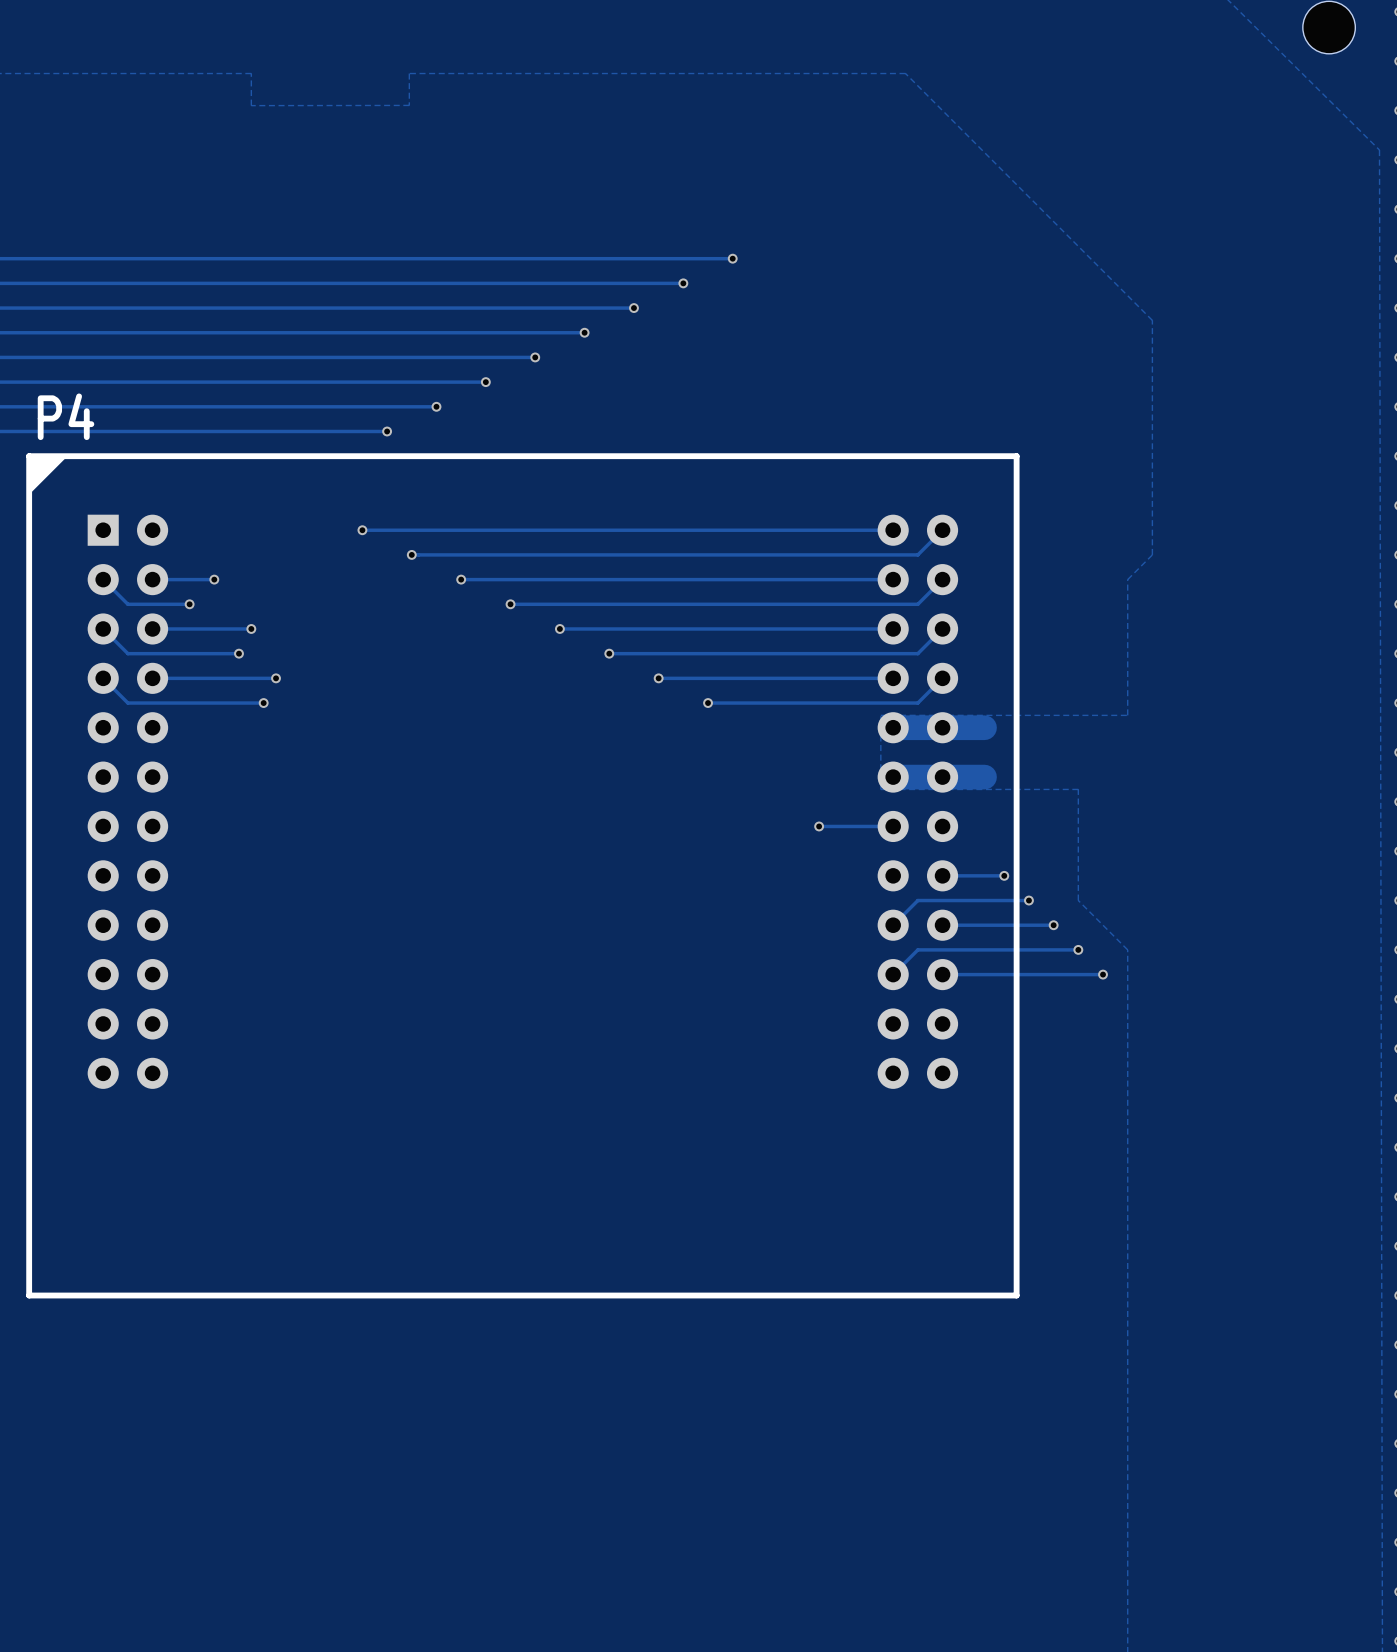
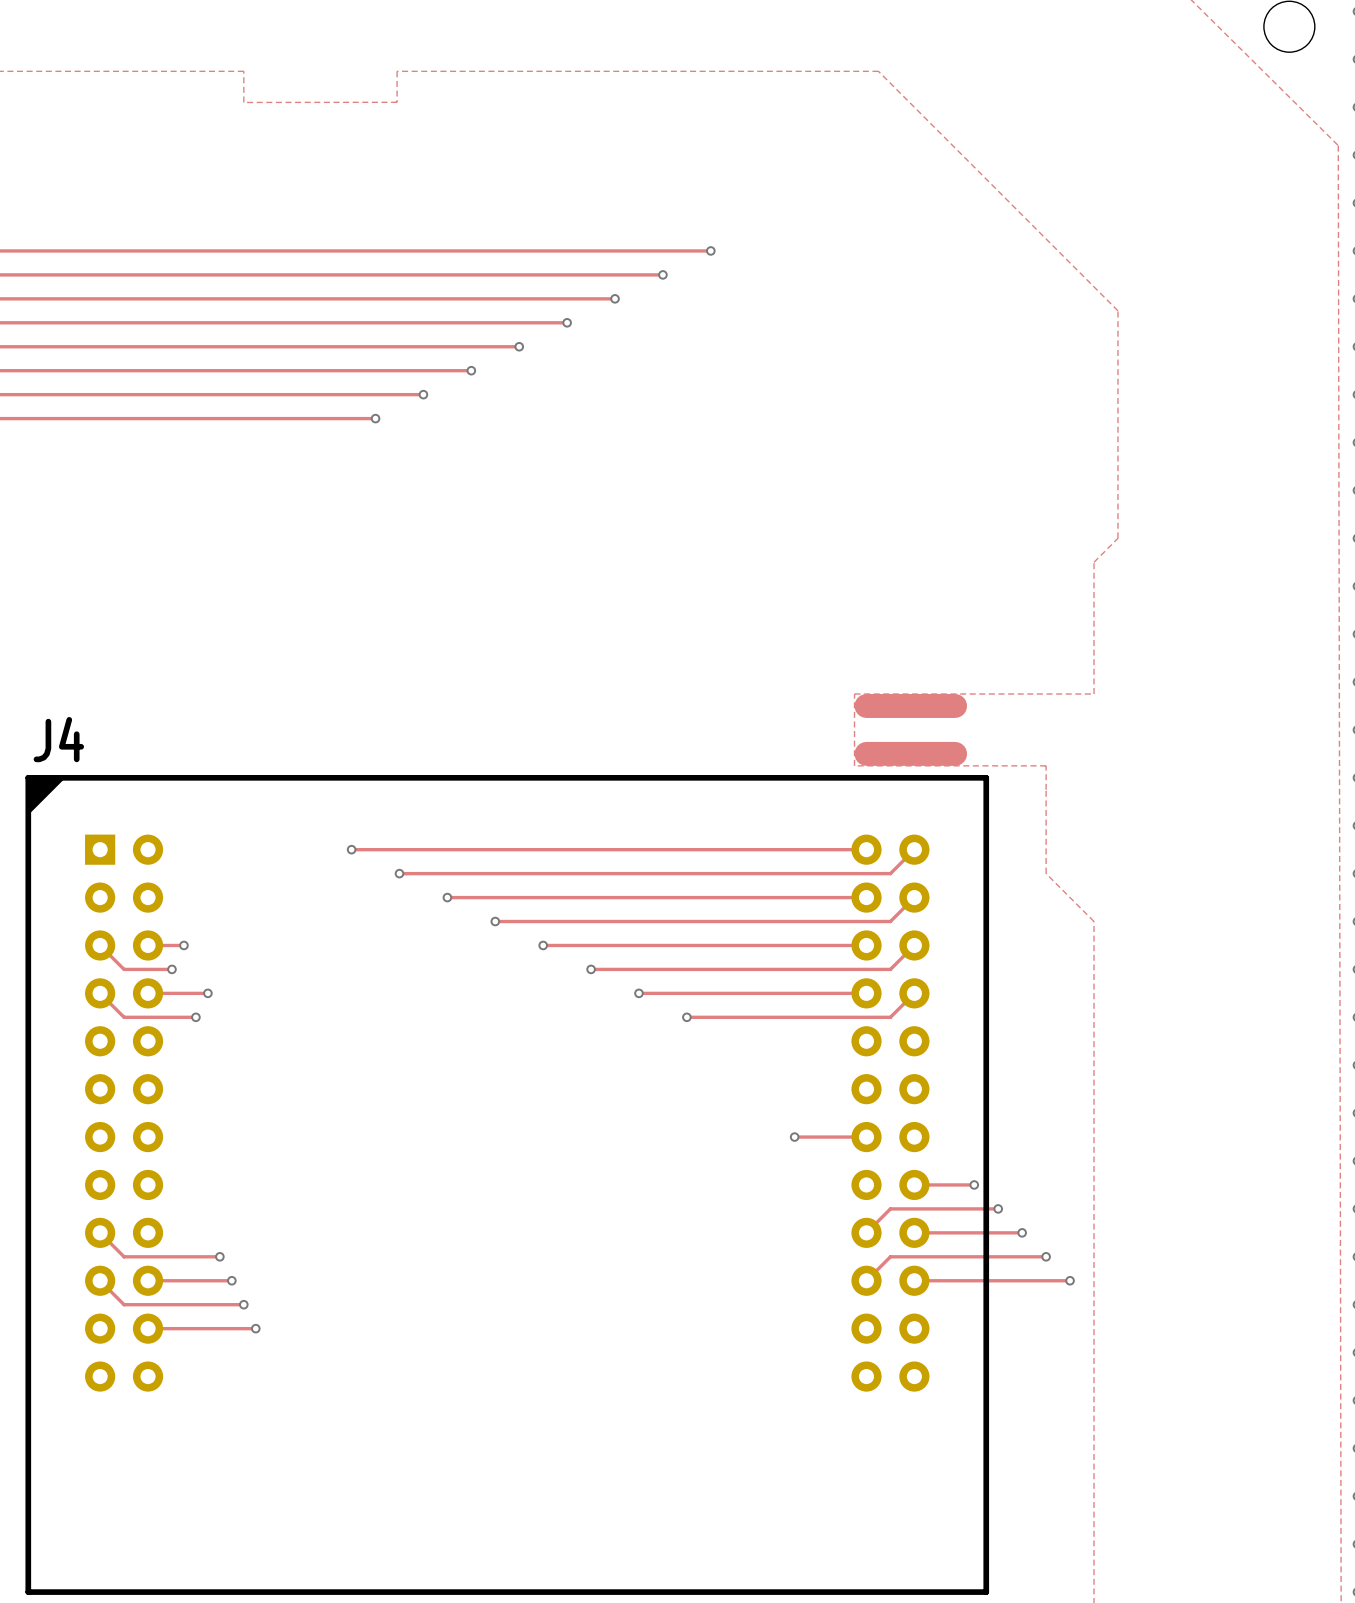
track: (362, 530) (893, 530) -> (351, 849) (866, 849)
via: (362, 530) -> none
track: (942, 530) (917, 554) (411, 554) -> none
via: (411, 554) -> none
track: (103, 579) (127, 604) (189, 604) -> none
track: (152, 579) (214, 579) -> (148, 993) (207, 993)
via: (214, 579) -> none
track: (461, 579) (893, 579) -> none
via: (461, 579) -> none
track: (942, 579) (917, 604) (510, 604) -> none
via: (189, 604) -> none
via: (510, 604) -> none
track: (103, 628) (127, 653) (238, 653) -> none
track: (152, 628) (251, 628) -> none
via: (251, 628) -> none
track: (559, 628) (893, 628) -> none
via: (559, 628) -> none
track: (942, 628) (917, 653) (609, 653) -> none
via: (238, 653) -> none
via: (609, 653) -> none
track: (103, 678) (127, 703) (263, 703) -> none
track: (152, 678) (276, 678) -> none
via: (276, 678) -> none
track: (658, 678) (893, 678) -> (638, 993) (866, 993)
via: (658, 678) -> none
track: (942, 678) (917, 703) (708, 703) -> (914, 993) (890, 1017) (686, 1017)
via: (263, 703) -> none
via: (708, 703) -> none
track: (819, 826) (893, 826) -> (794, 1137) (866, 1137)
via: (819, 826) -> none
via: none -> (351, 849)
P4: (522, 875) -> none
track: (942, 875) (1004, 875) -> (914, 849) (890, 873) (399, 873)
via: (1004, 875) -> none
via: none -> (399, 873)
track: (1028, 900) (917, 900) (893, 925) -> (447, 897) (866, 897)
via: (1028, 900) -> none
via: none -> (447, 897)
track: (942, 925) (1053, 925) -> (914, 897) (890, 921) (495, 921)
via: (1053, 925) -> none
via: none -> (495, 921)
track: (1078, 949) (917, 949) (893, 974) -> (543, 945) (866, 945)
via: (1078, 949) -> none
track: none -> (100, 945) (124, 969) (171, 969)
track: none -> (148, 945) (183, 945)
via: none -> (183, 945)
via: none -> (543, 945)
track: (942, 974) (1103, 974) -> (914, 945) (890, 969) (591, 969)
via: (1103, 974) -> none
via: none -> (171, 969)
via: none -> (591, 969)
track: none -> (100, 993) (124, 1017) (195, 1017)
via: none -> (207, 993)
via: none -> (638, 993)
via: none -> (195, 1017)
via: none -> (686, 1017)
via: none -> (794, 1137)
J4: none -> (507, 1184)
track: none -> (914, 1184) (974, 1184)
via: none -> (974, 1184)
track: none -> (998, 1208) (890, 1208) (866, 1232)
via: none -> (998, 1208)
track: none -> (100, 1232) (124, 1256) (219, 1256)
track: none -> (914, 1232) (1022, 1232)
via: none -> (1022, 1232)
via: none -> (219, 1256)
track: none -> (1046, 1256) (890, 1256) (866, 1280)
via: none -> (1046, 1256)
track: none -> (100, 1280) (124, 1304) (243, 1304)
track: none -> (148, 1280) (231, 1280)
via: none -> (231, 1280)
track: none -> (914, 1280) (1070, 1280)
via: none -> (1070, 1280)
via: none -> (243, 1304)
track: none -> (148, 1328) (255, 1328)
via: none -> (255, 1328)

